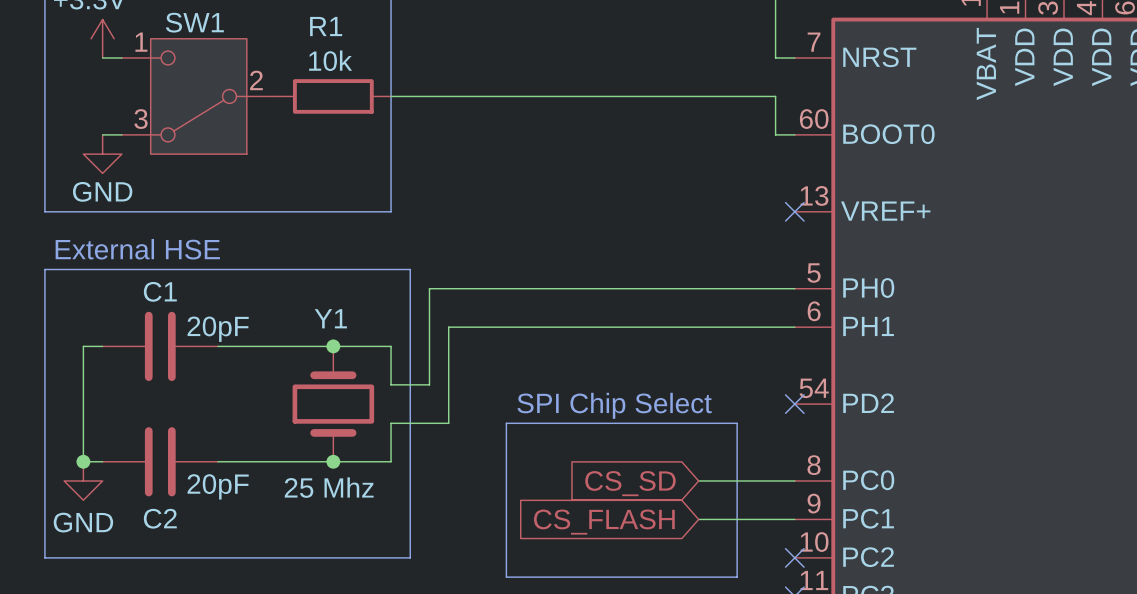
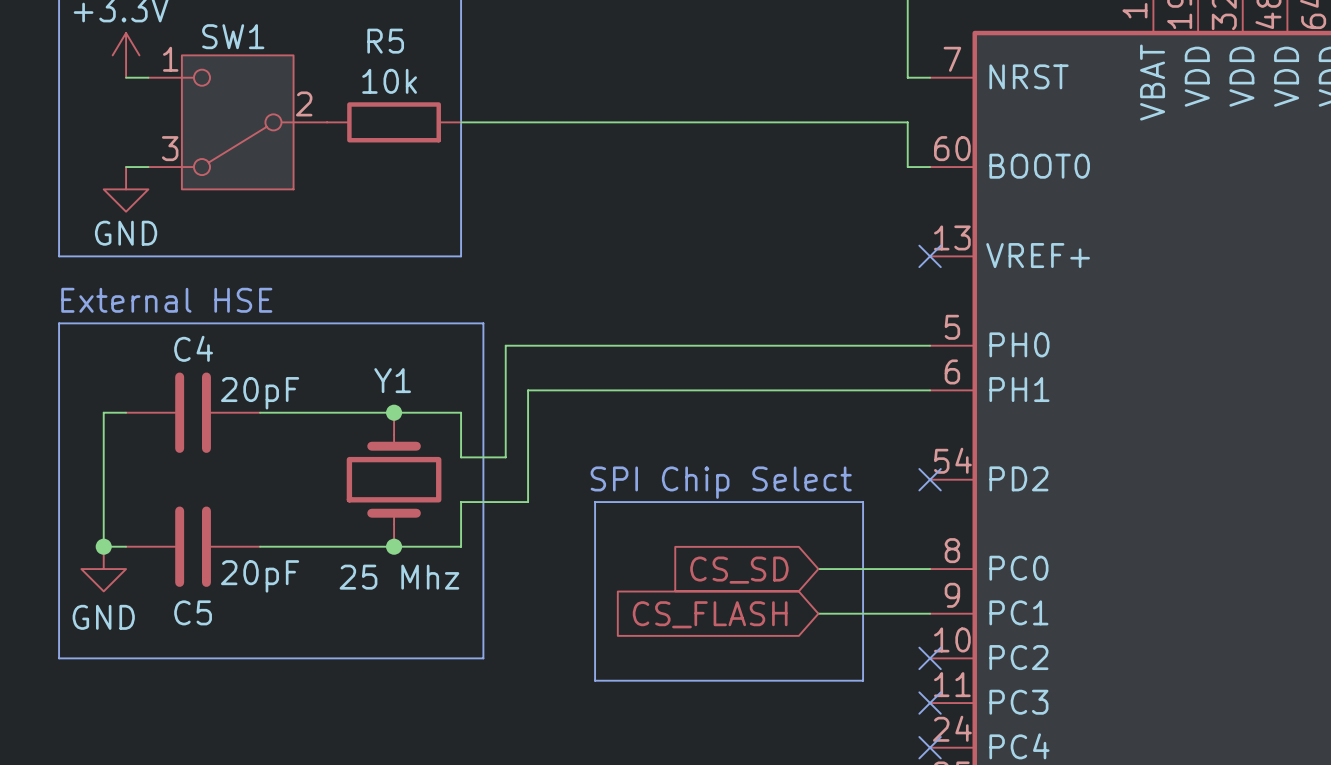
R1 name: R1 (326, 26) -> R5 (385, 41)
C1 name: C1 (160, 291) -> C4 (193, 348)
C2 name: C2 (160, 518) -> C5 (193, 612)

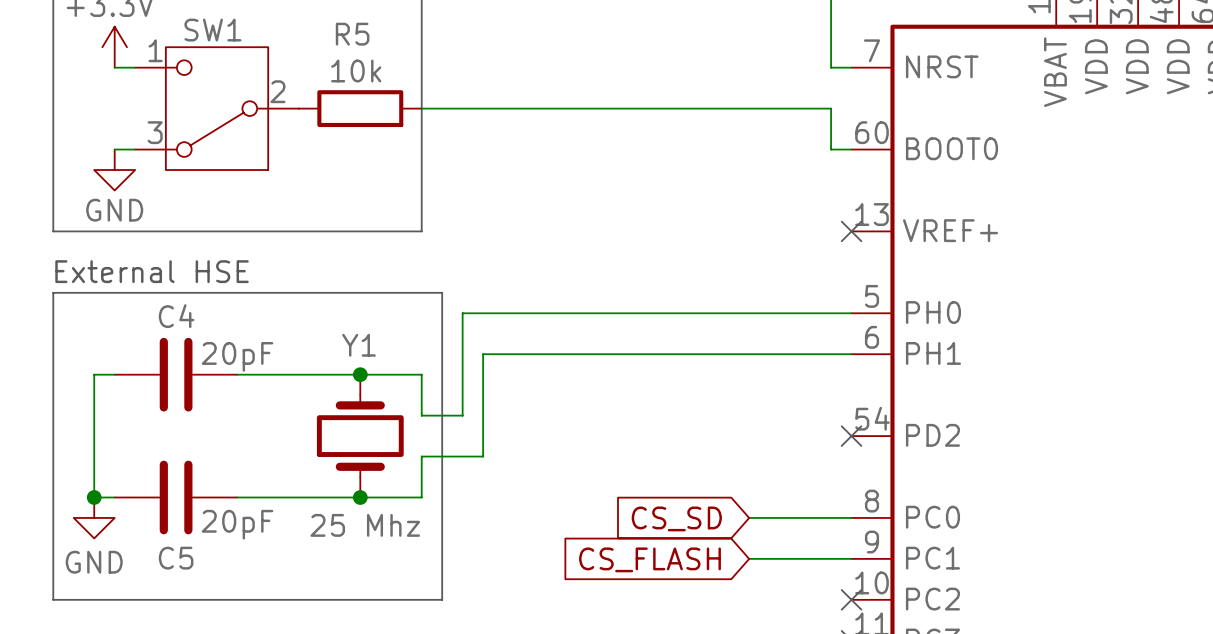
text: SPI Chip Select (721, 482) -> none
line: (595, 502) (863, 502) (863, 680) (595, 680) (595, 502) -> none

